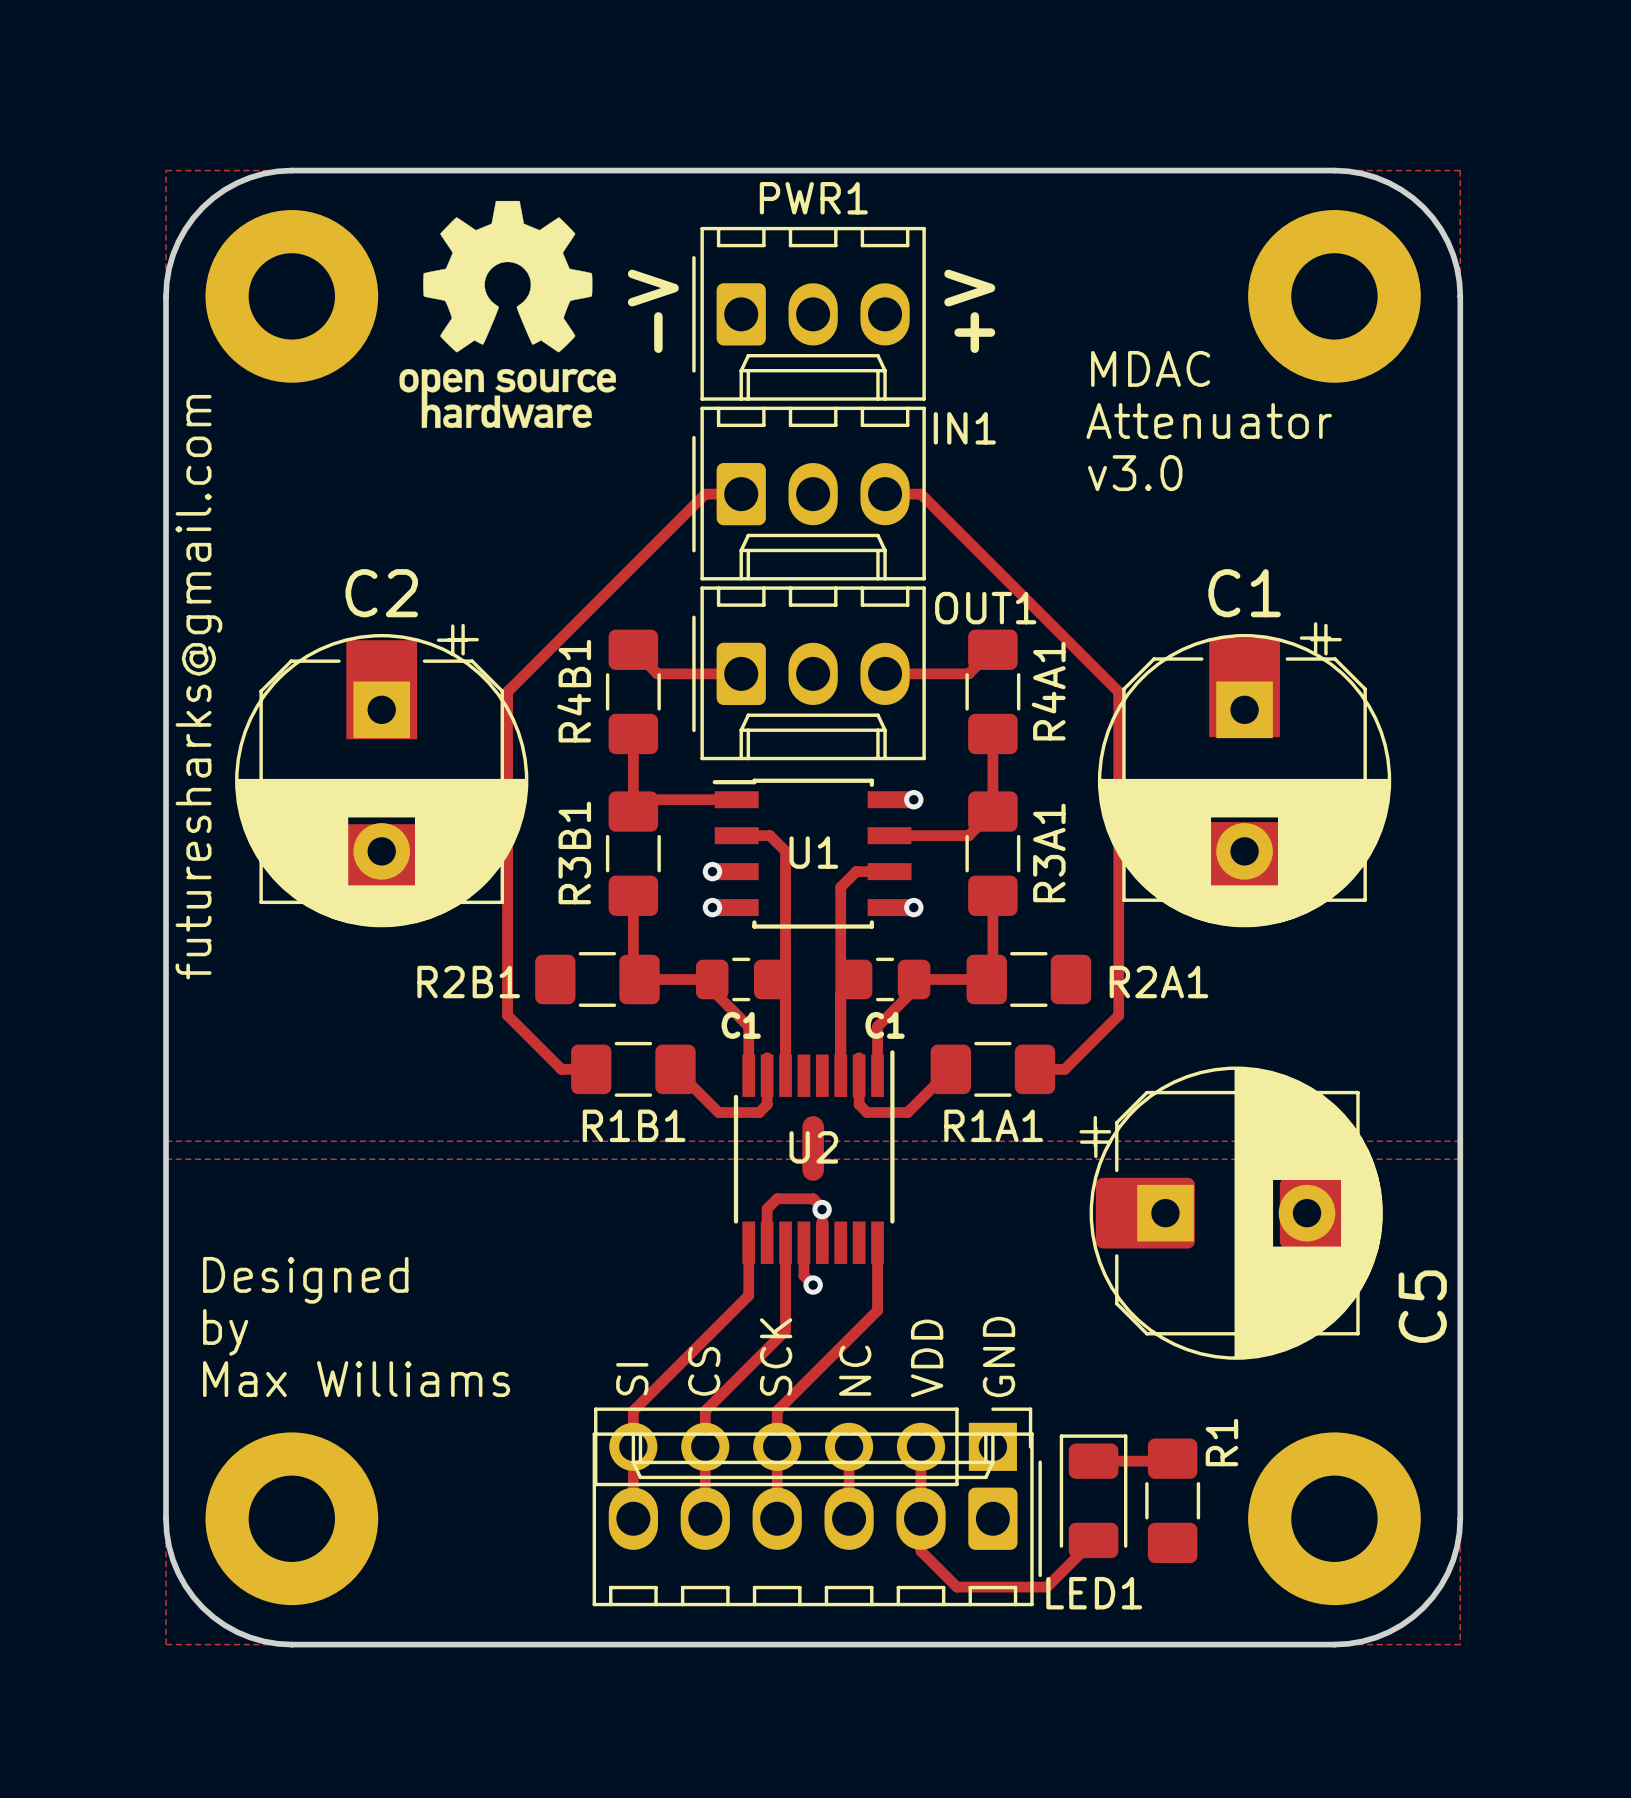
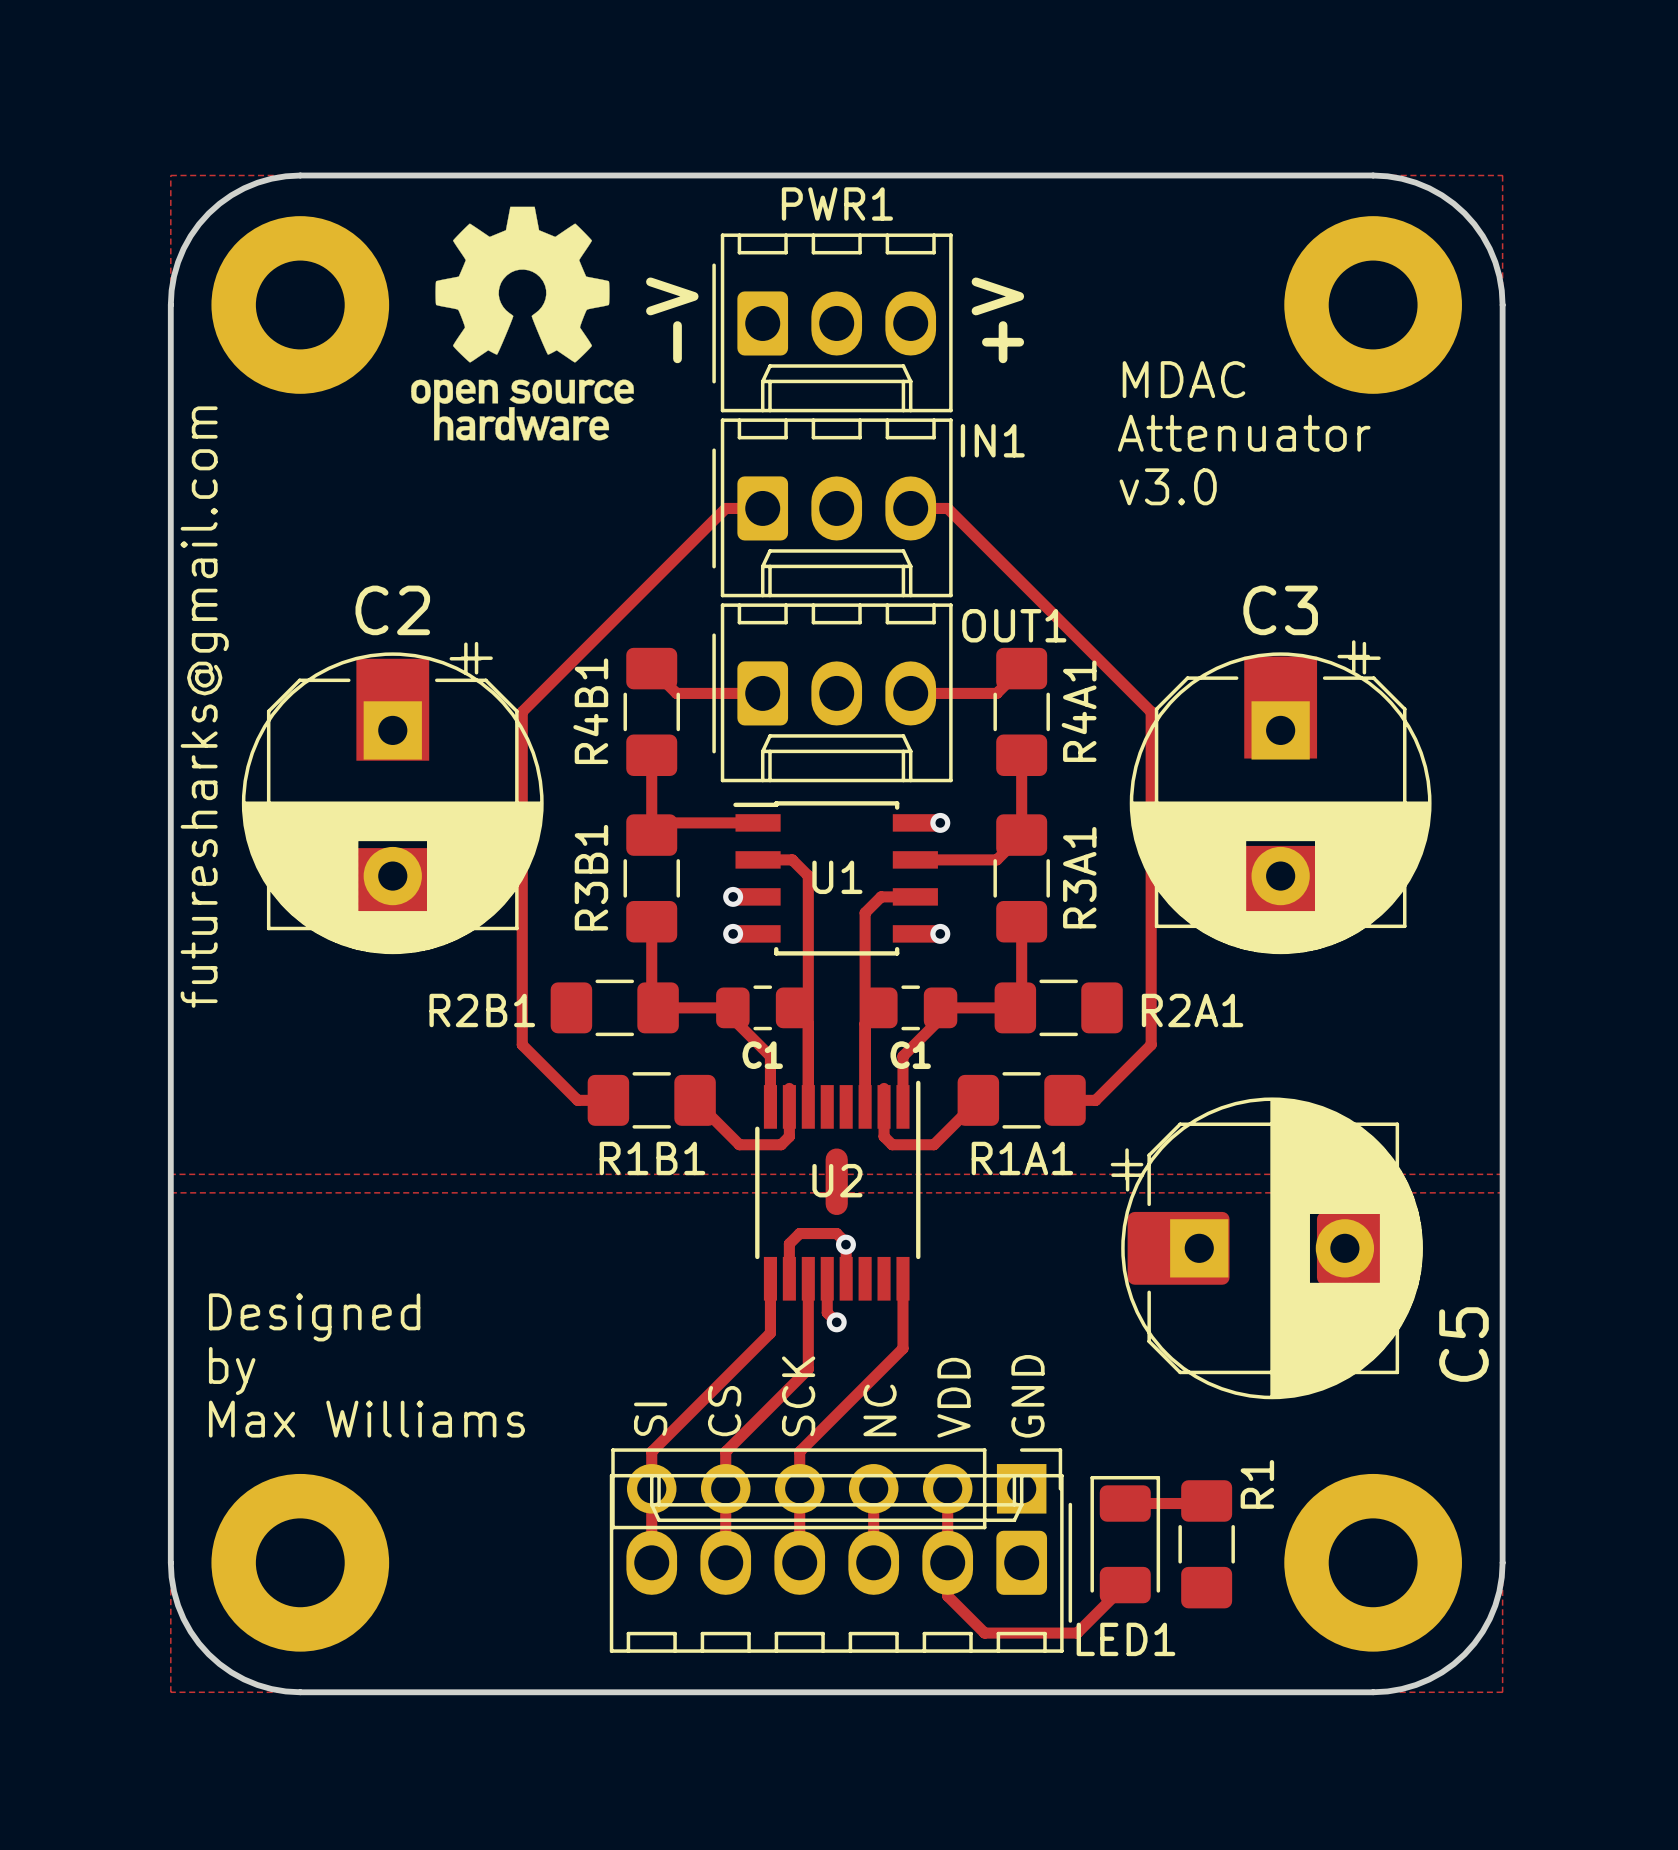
text: C1 (1244, 593) -> C3 (1280, 610)

